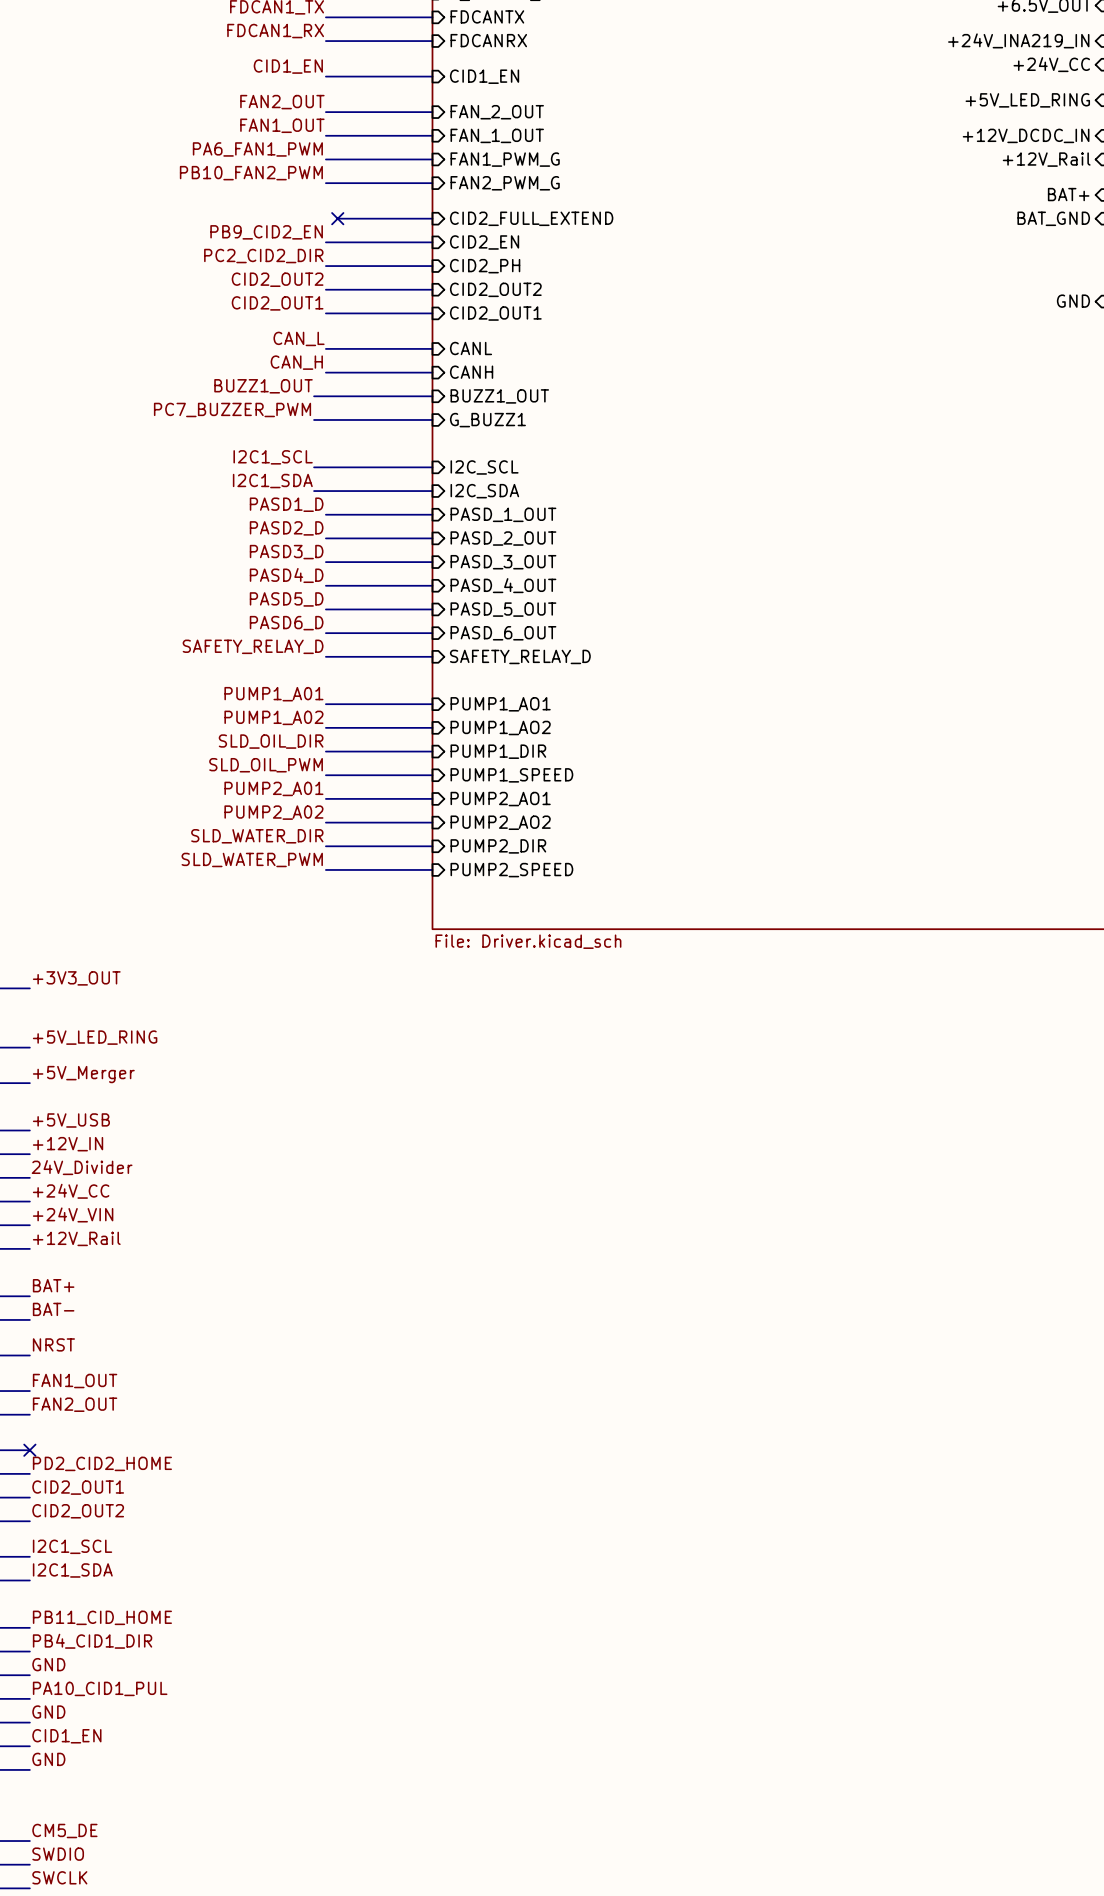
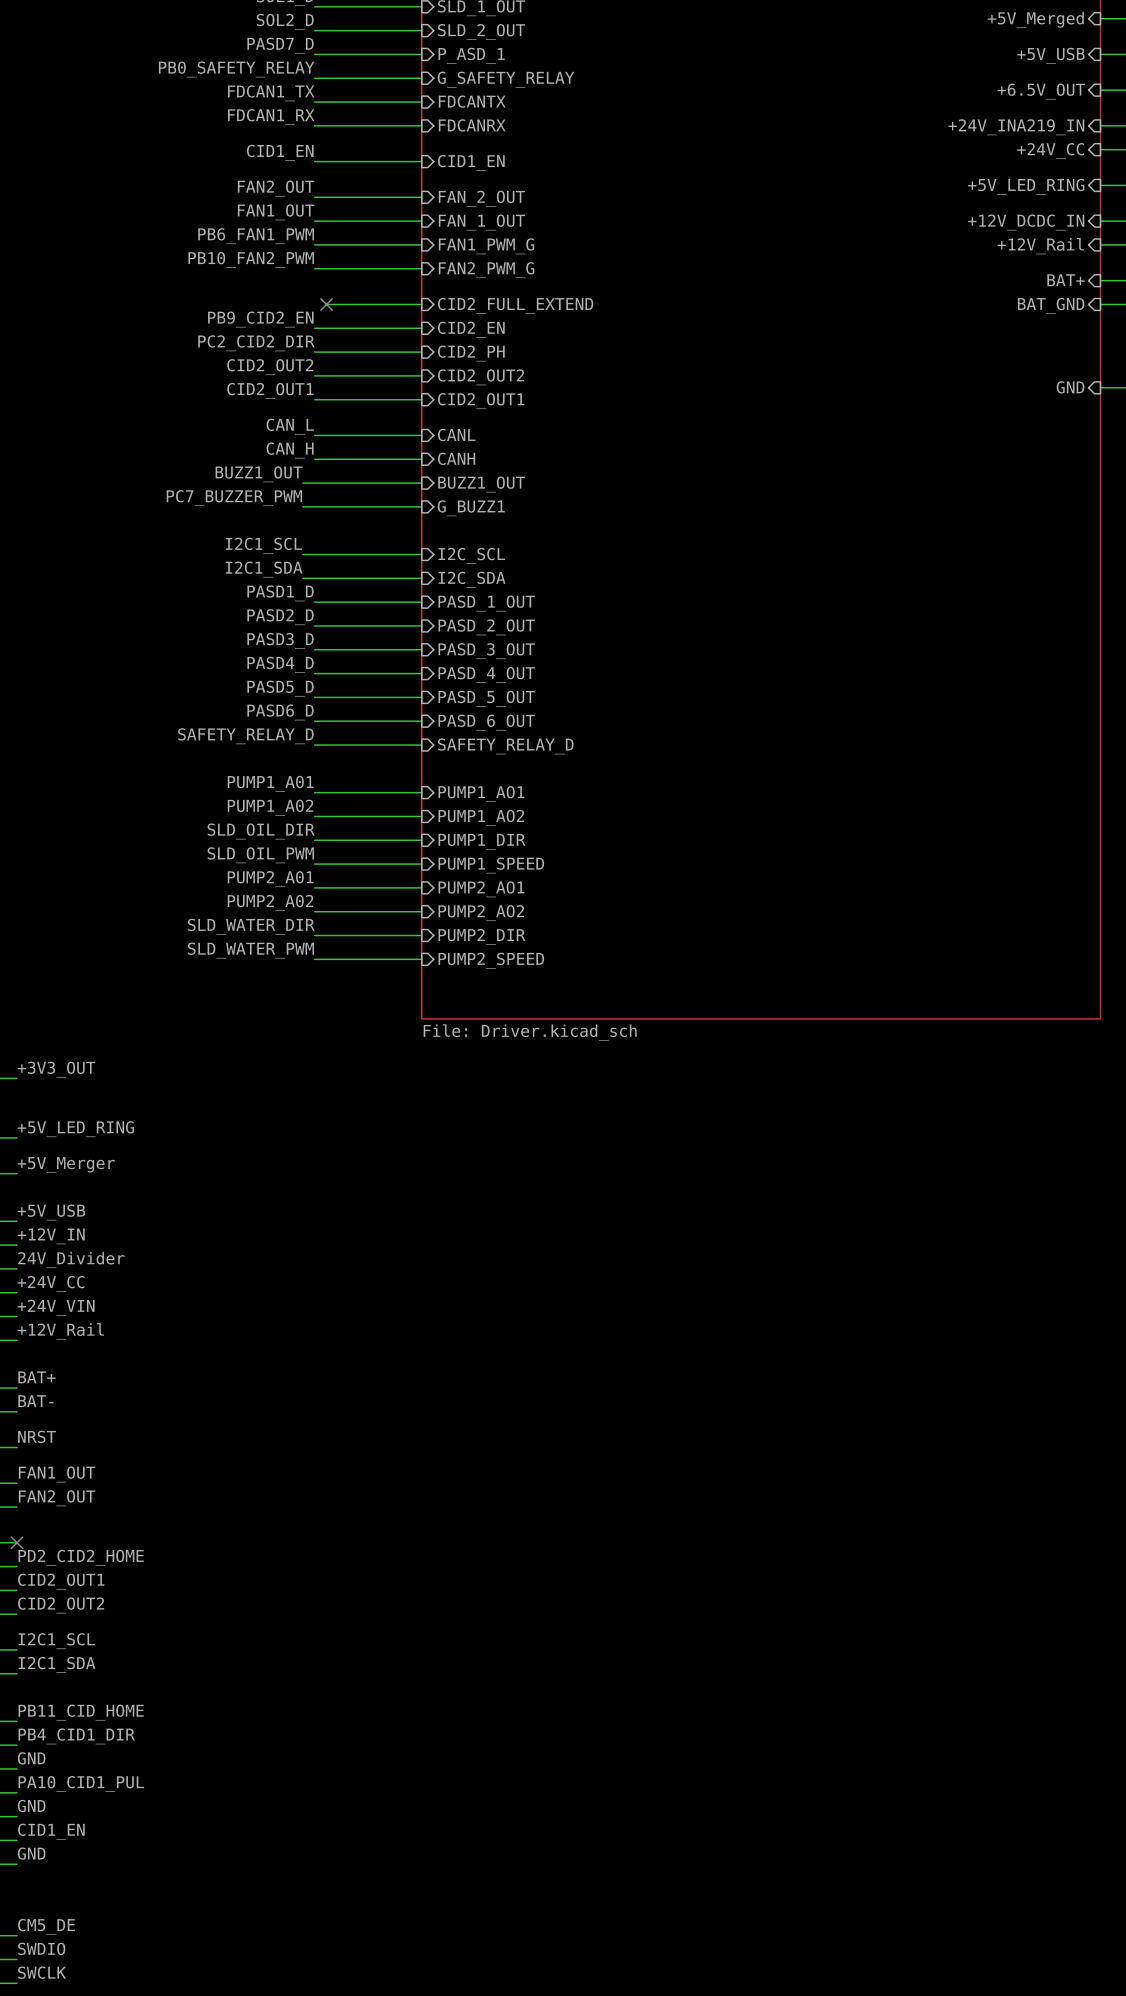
label: PA6_FAN1_PWM (257, 149) -> PB6_FAN1_PWM (256, 236)

